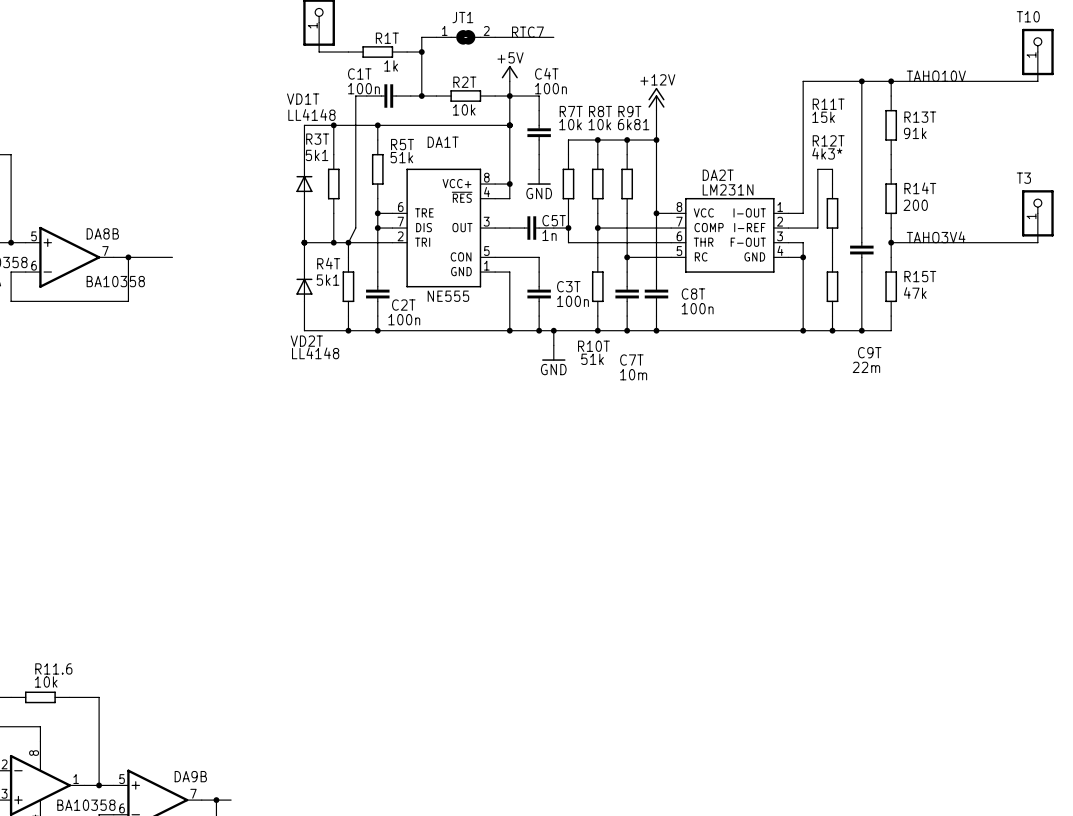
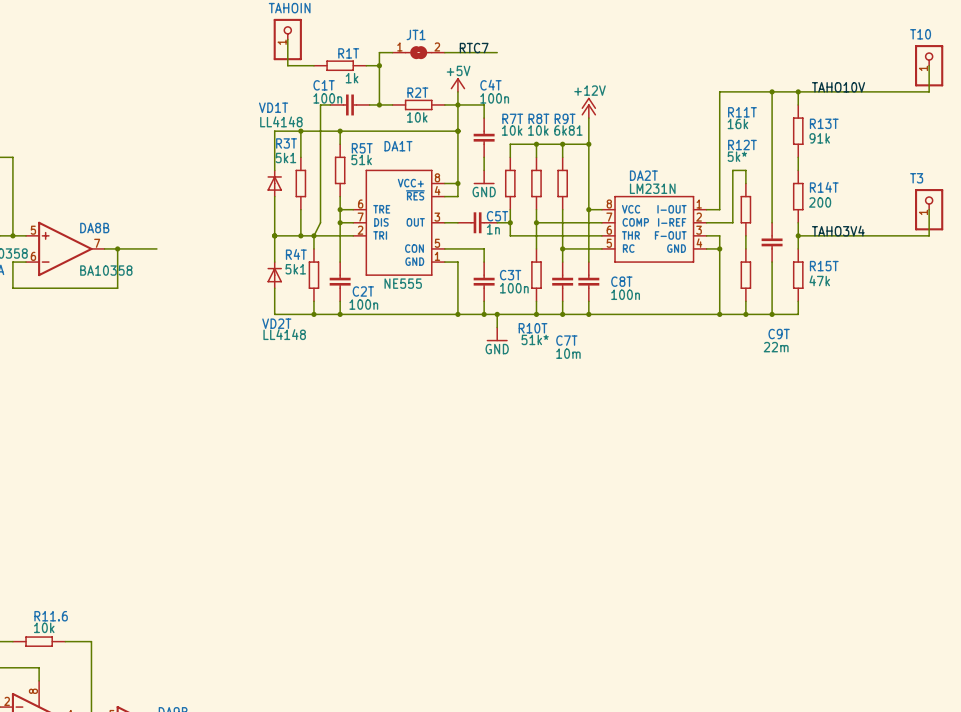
R11T value: 15k (823, 117) -> 16k (737, 123)
R12T value: 4k3* (827, 153) -> 5k* (737, 156)
R10T value: 51k (592, 359) -> 51k* (535, 339)

